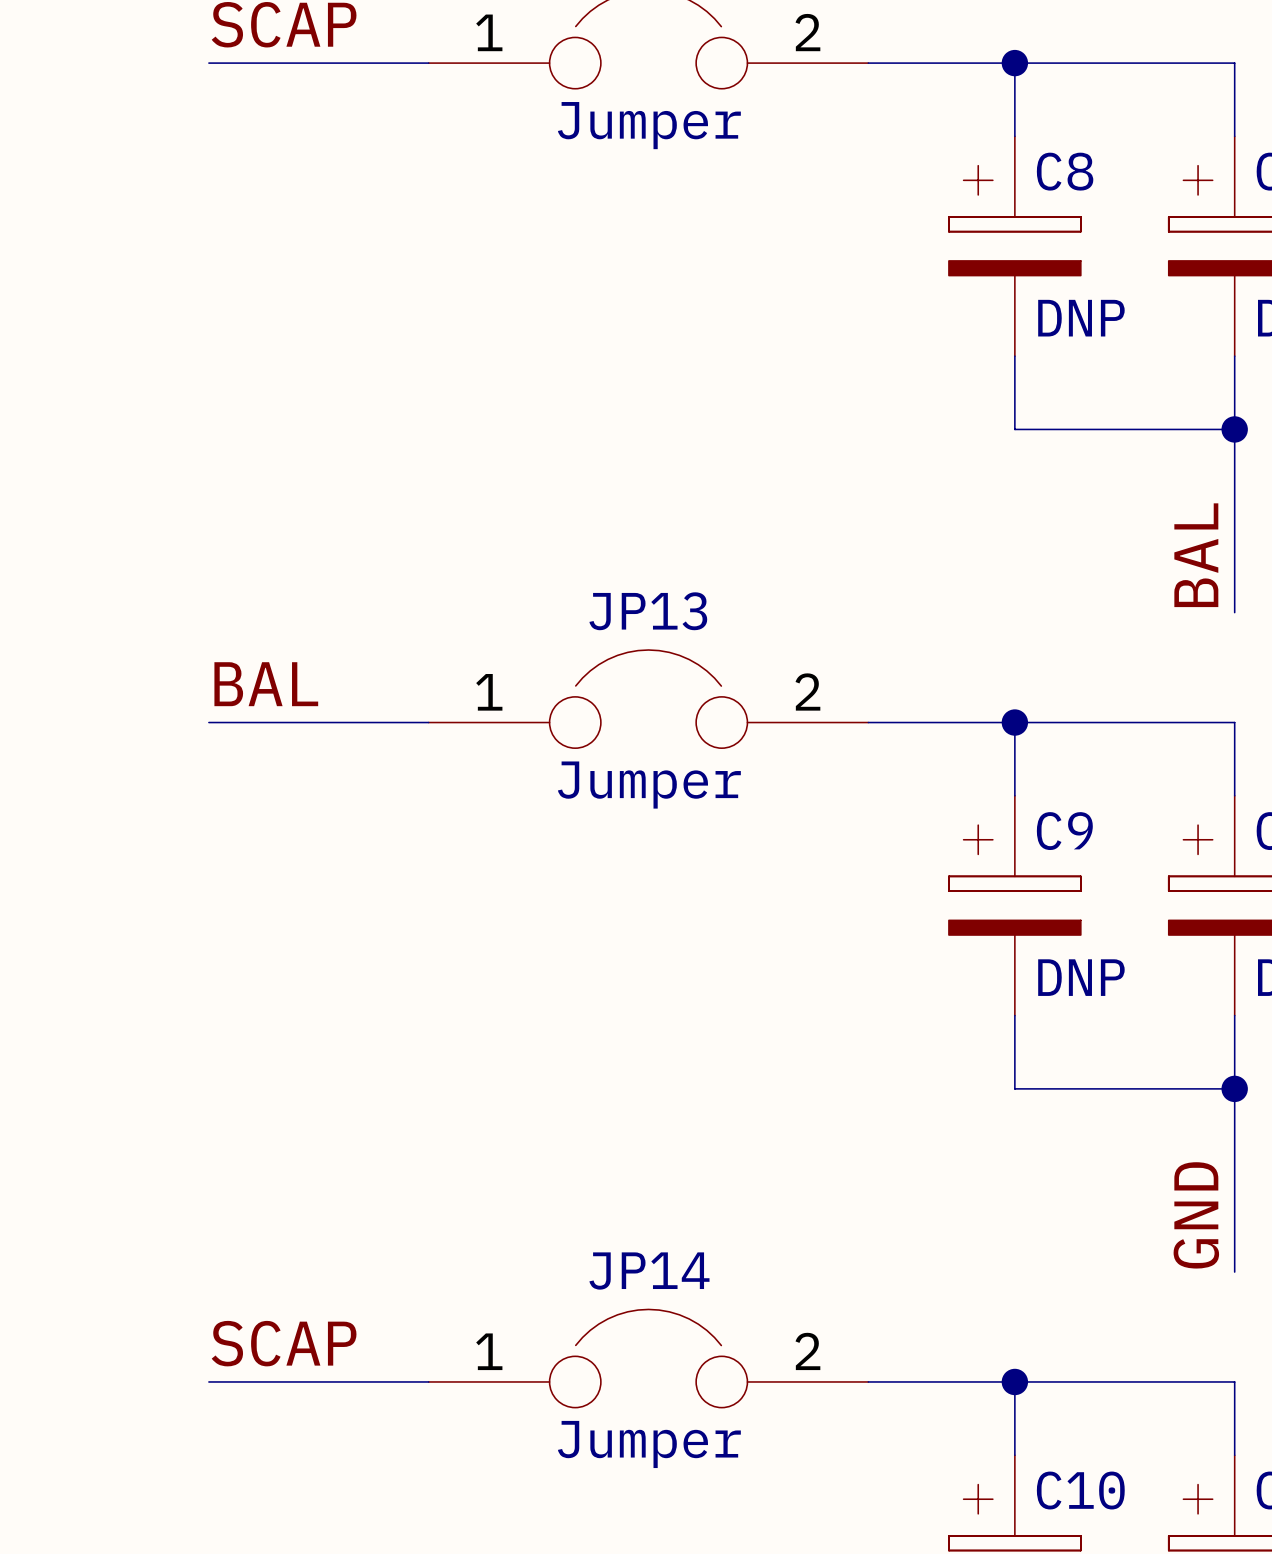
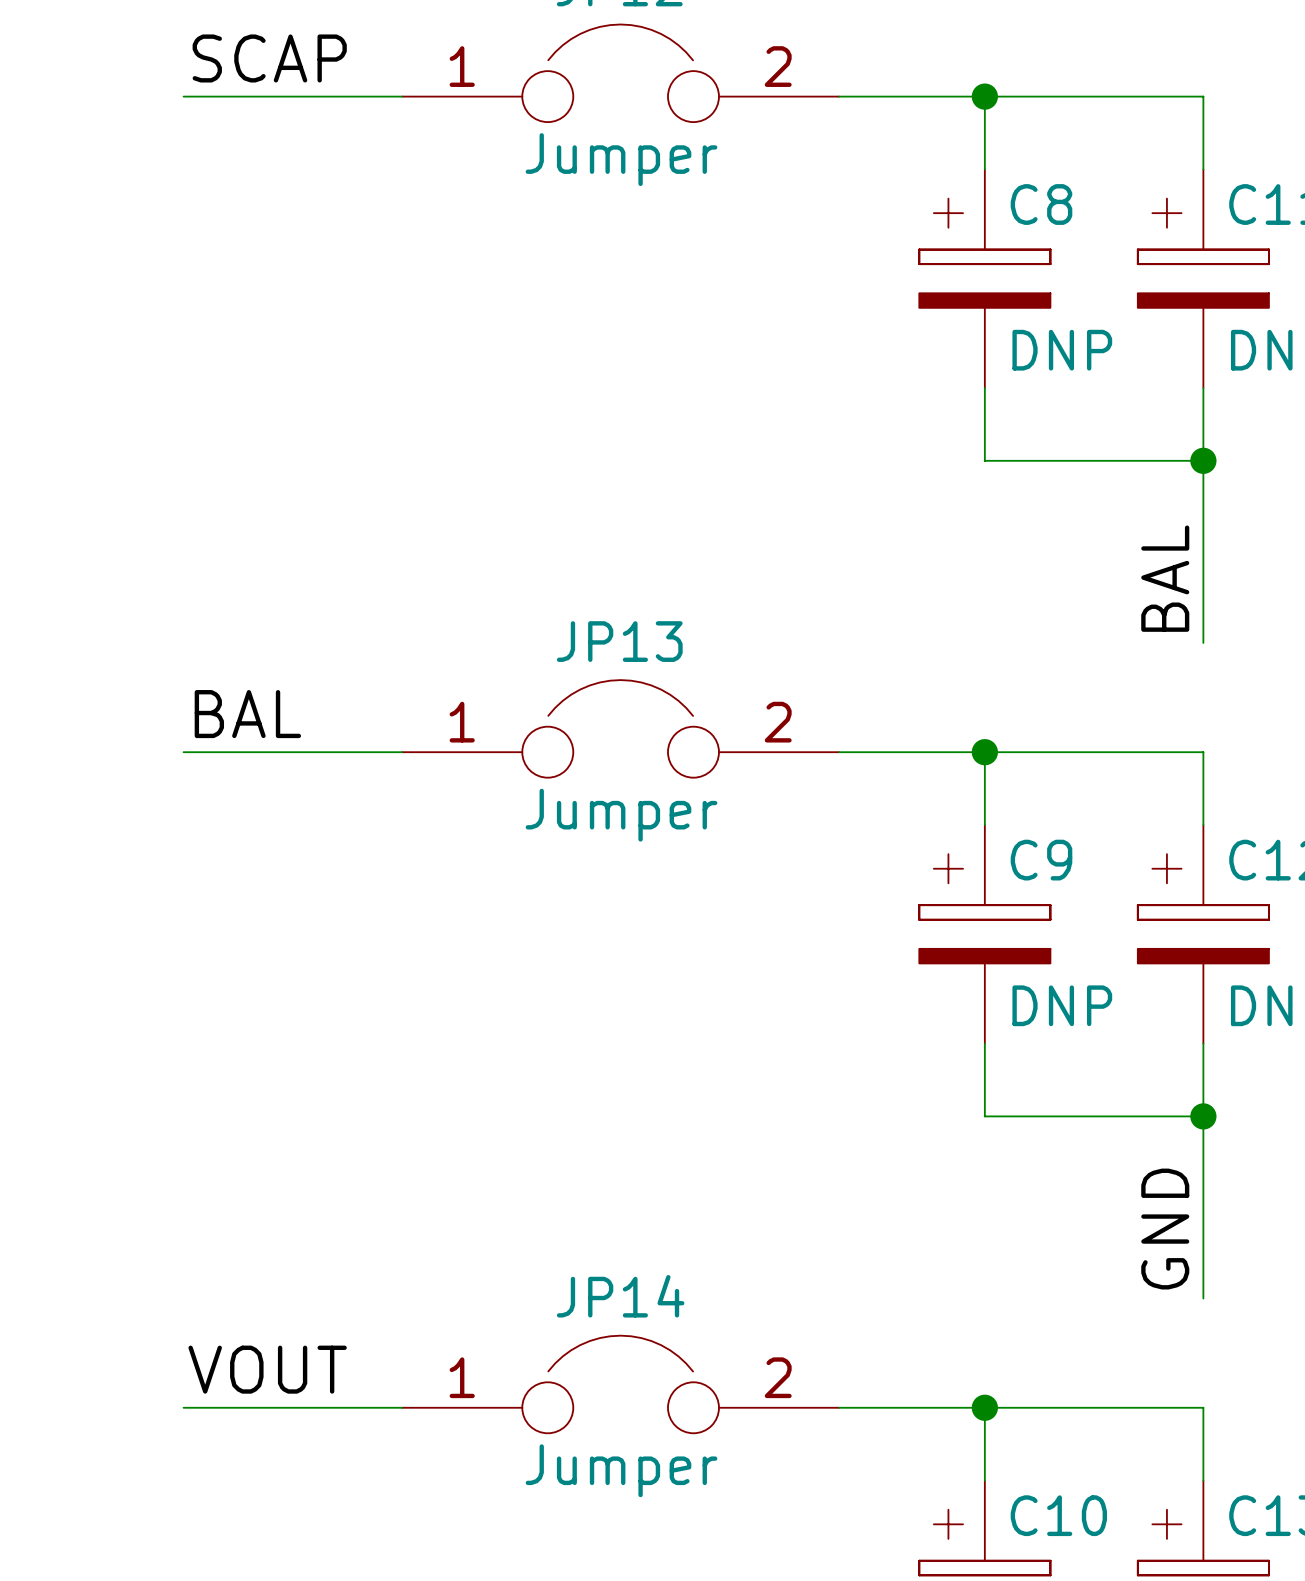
label: SCAP (284, 1343) -> VOUT (267, 1369)

